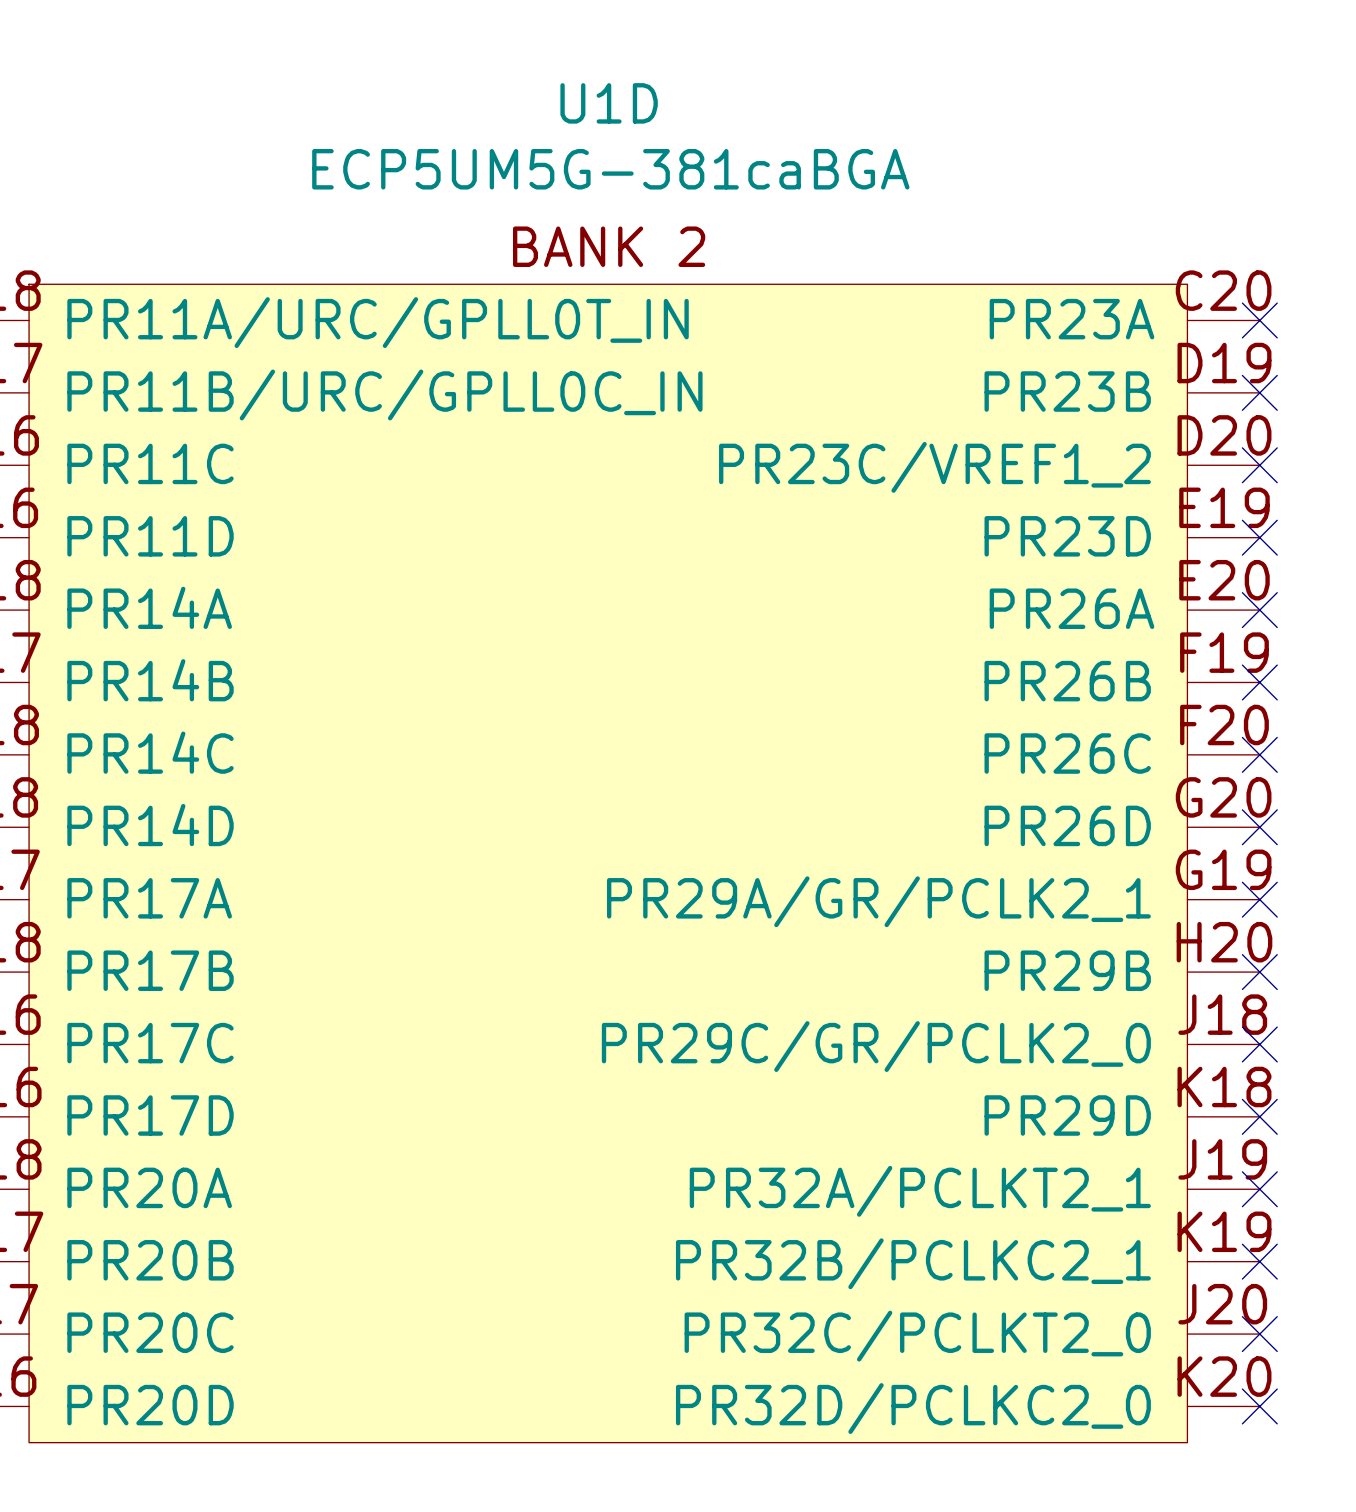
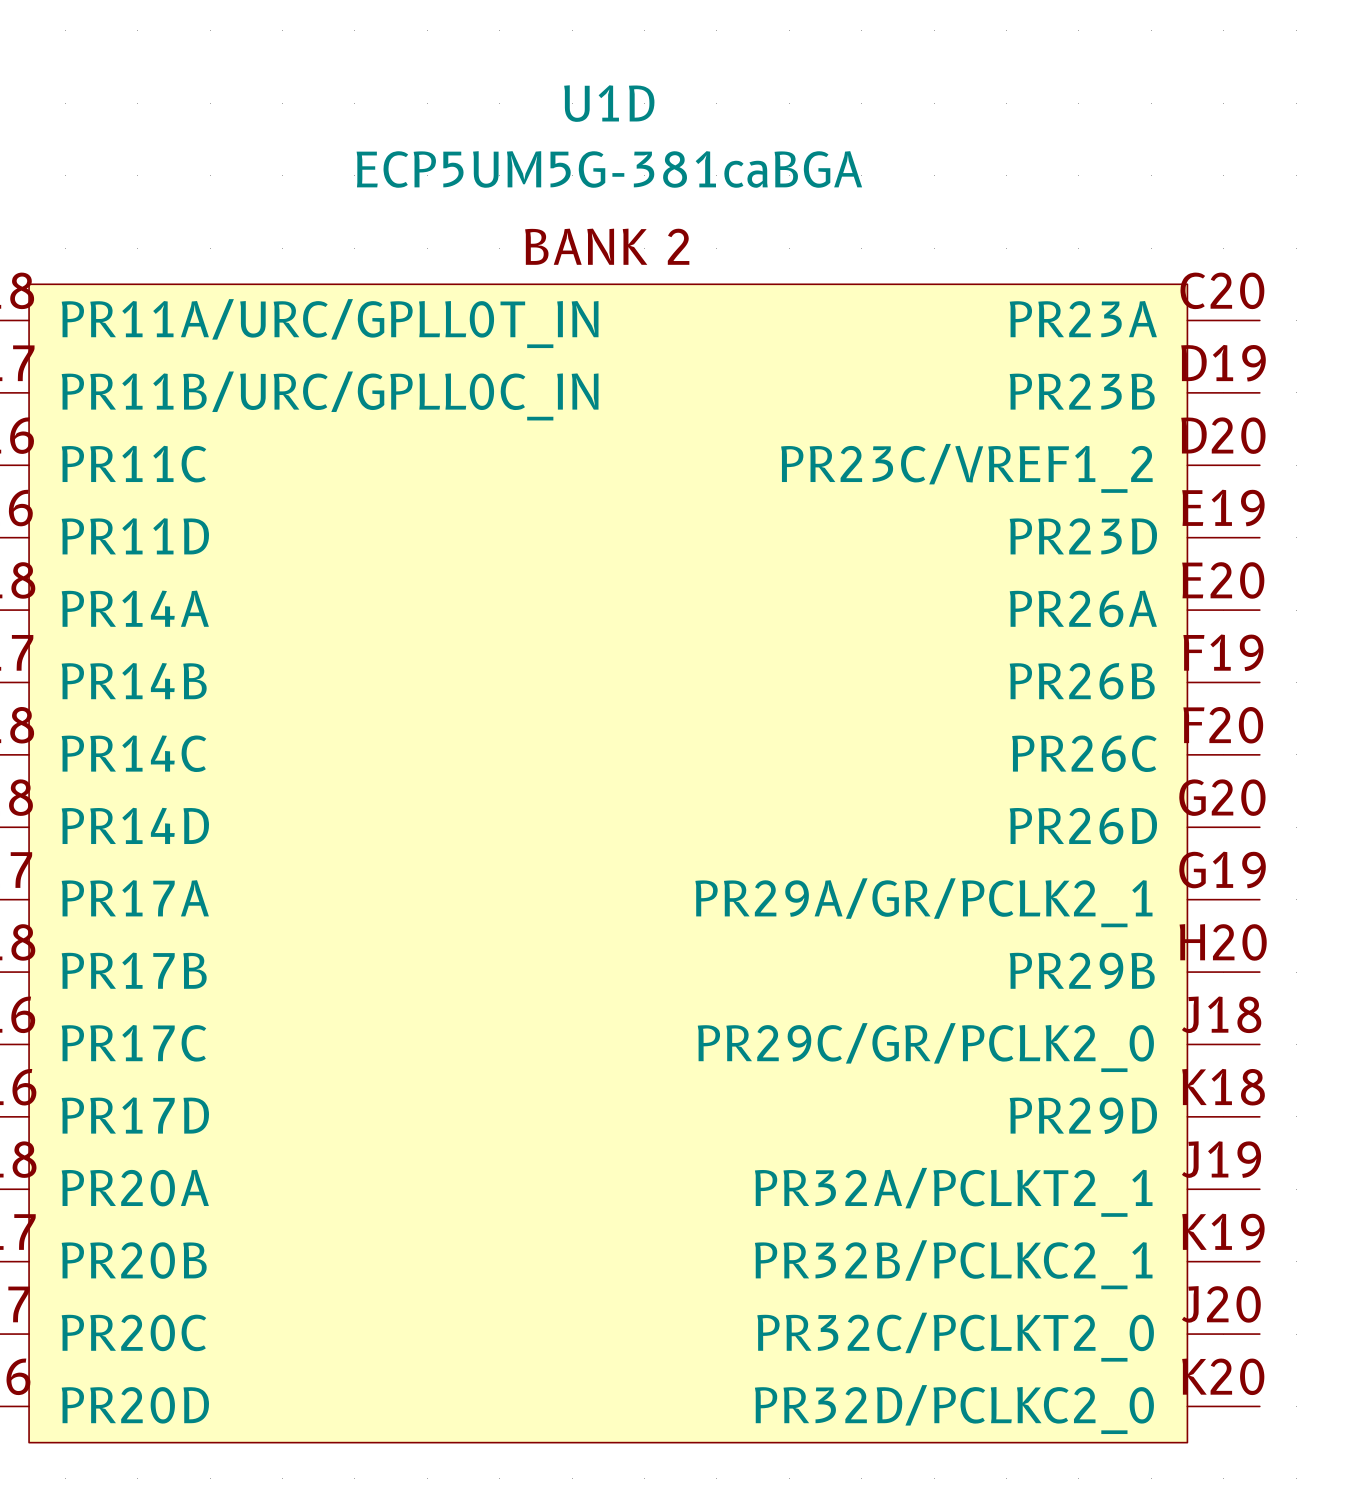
no-connect mark: (1259, 320) -> none
no-connect mark: (1259, 392) -> none
no-connect mark: (1259, 465) -> none
no-connect mark: (1259, 537) -> none
no-connect mark: (1259, 610) -> none
no-connect mark: (1259, 682) -> none
no-connect mark: (1259, 754) -> none
no-connect mark: (1259, 827) -> none
no-connect mark: (1259, 899) -> none
no-connect mark: (1259, 972) -> none
no-connect mark: (1259, 1044) -> none
no-connect mark: (1259, 1116) -> none
no-connect mark: (1259, 1189) -> none
no-connect mark: (1259, 1261) -> none
no-connect mark: (1259, 1334) -> none
no-connect mark: (1259, 1406) -> none

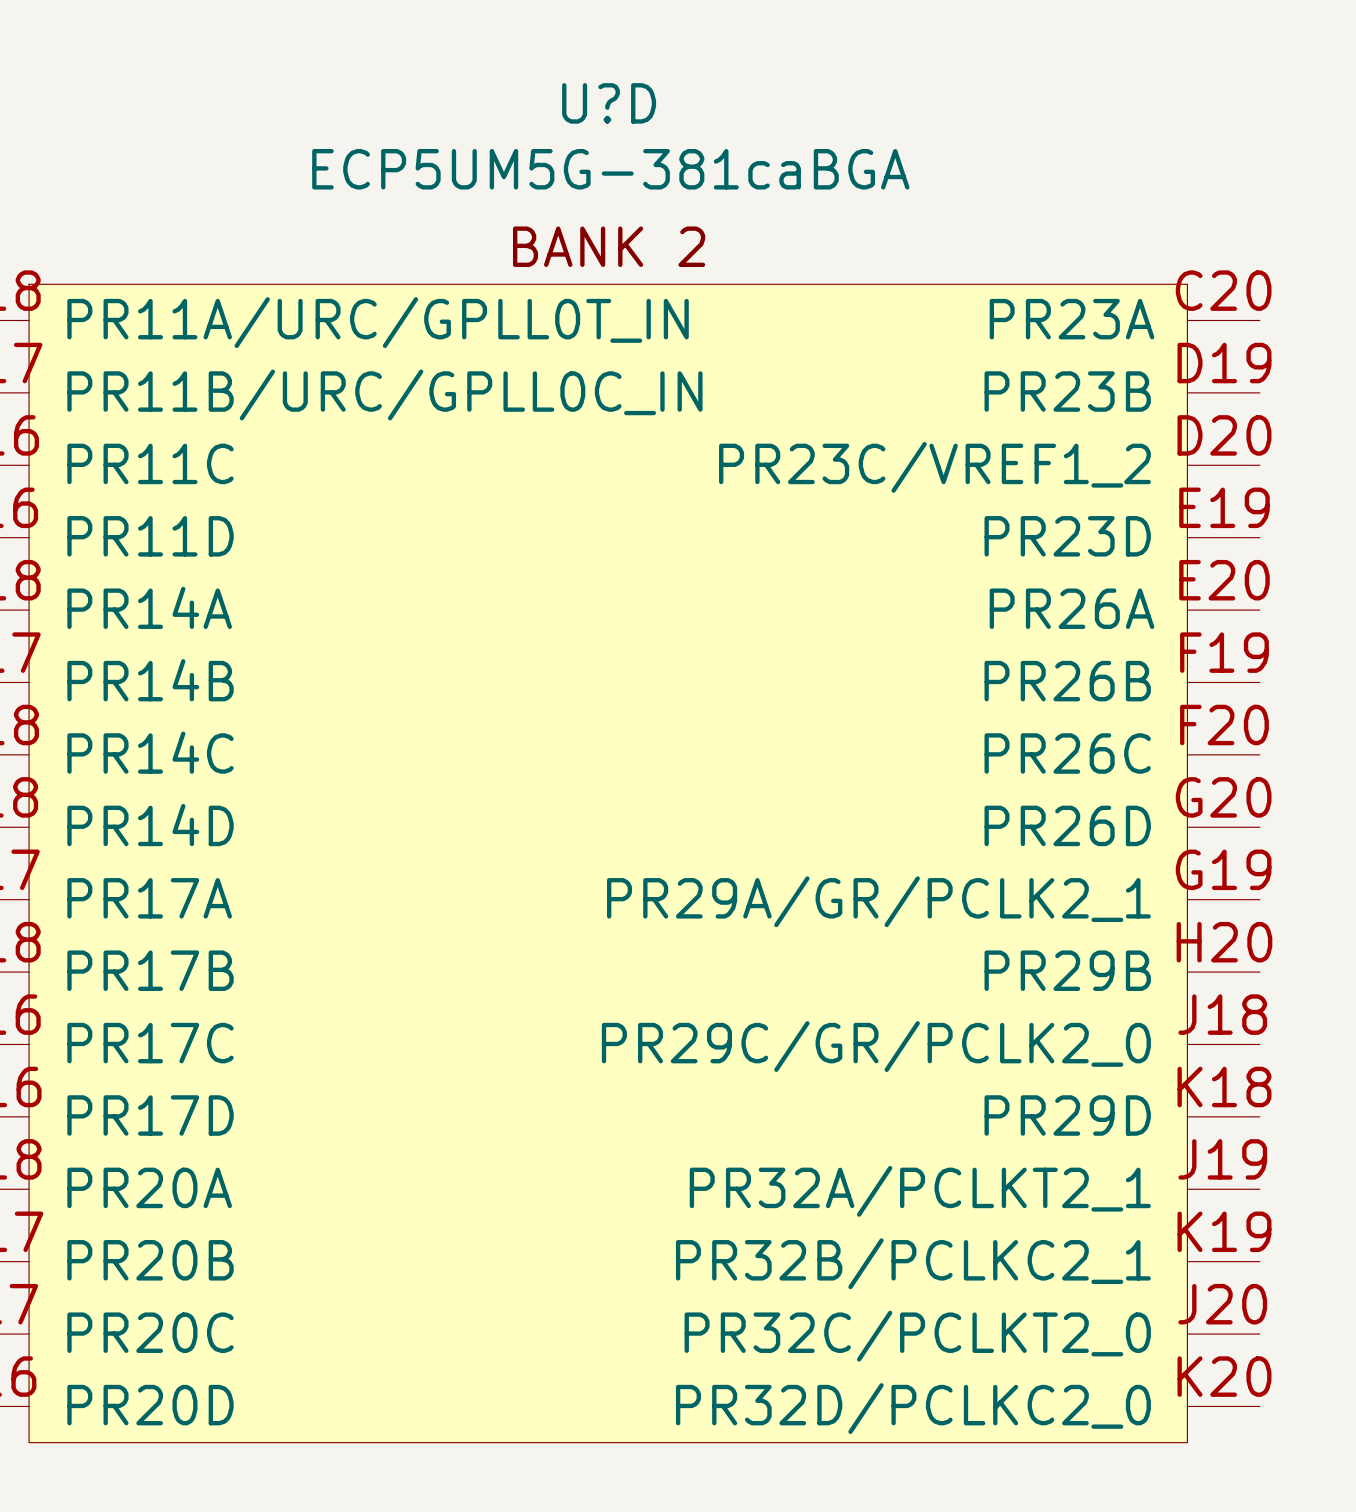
U1D name: U1D (609, 103) -> U?D (609, 103)

